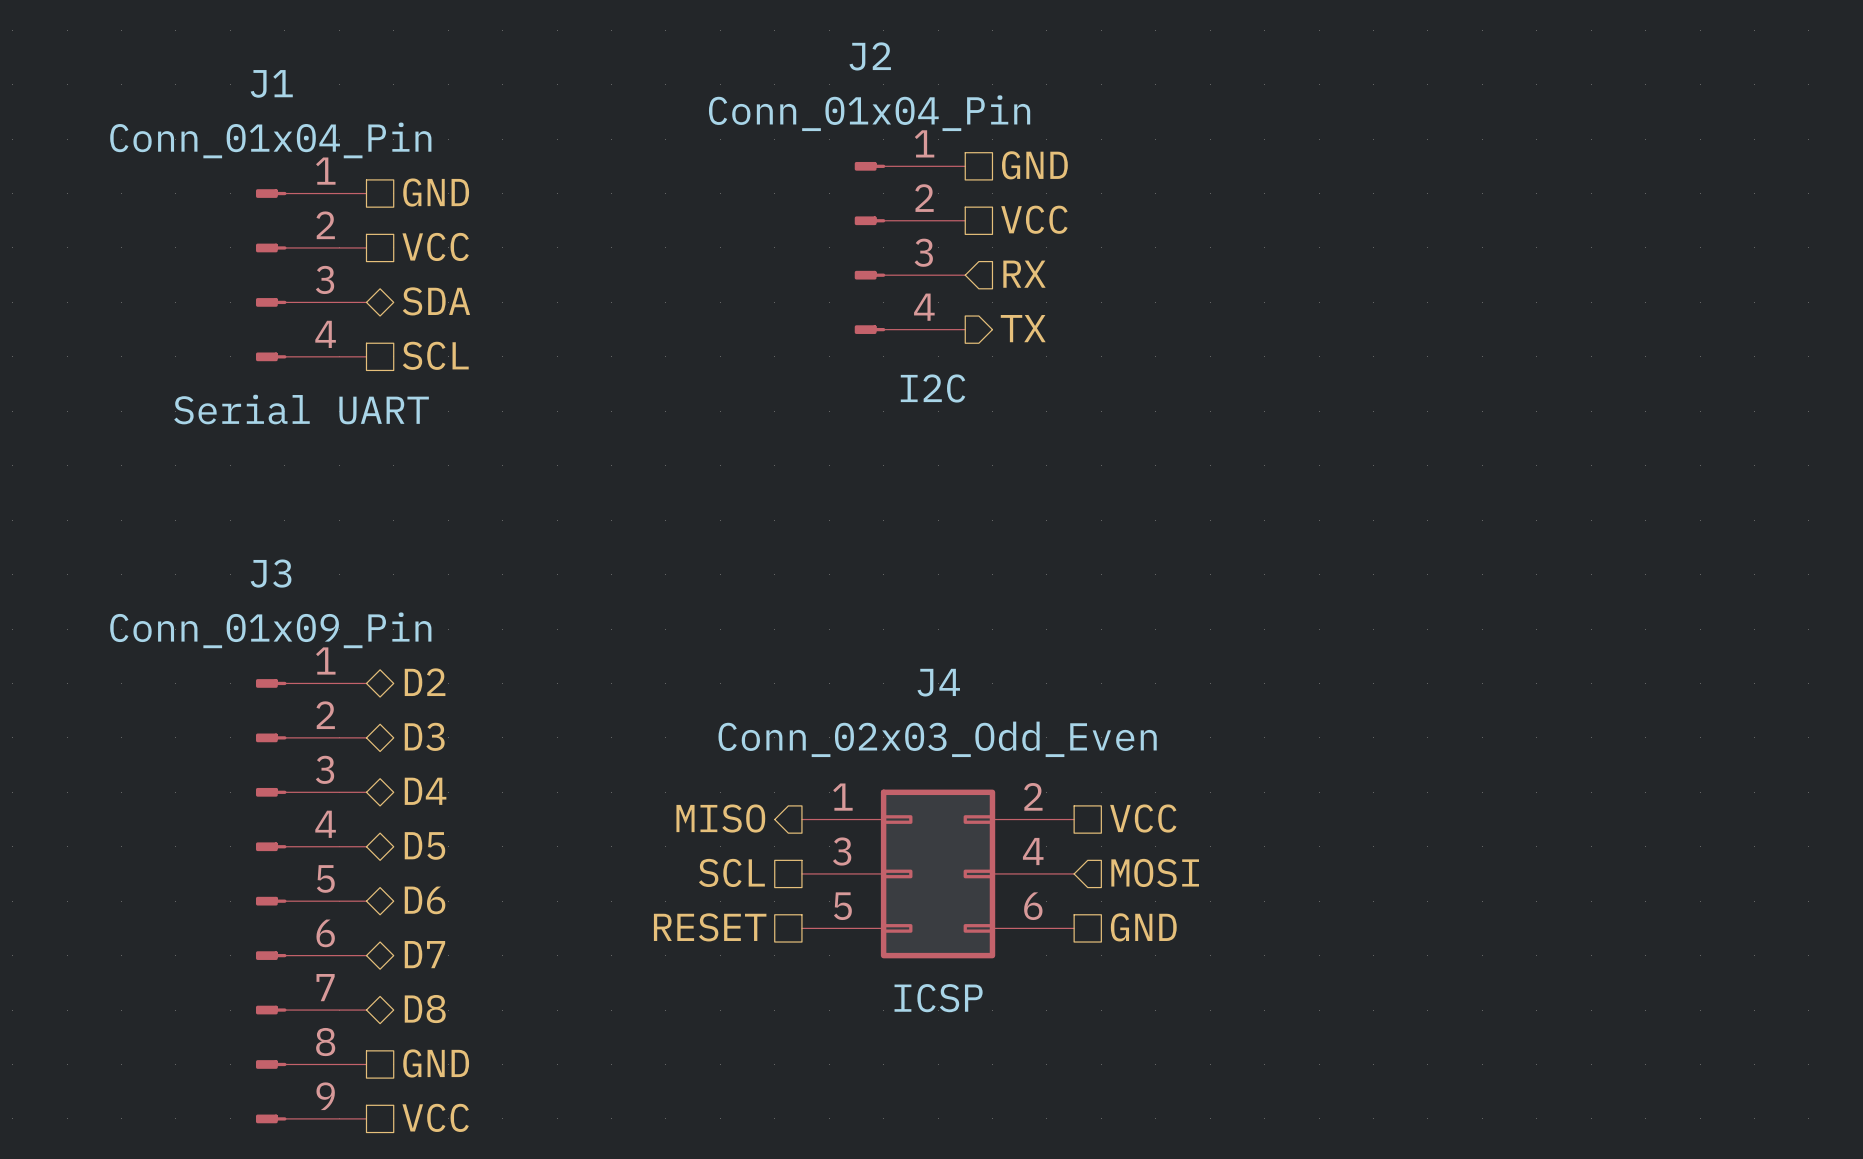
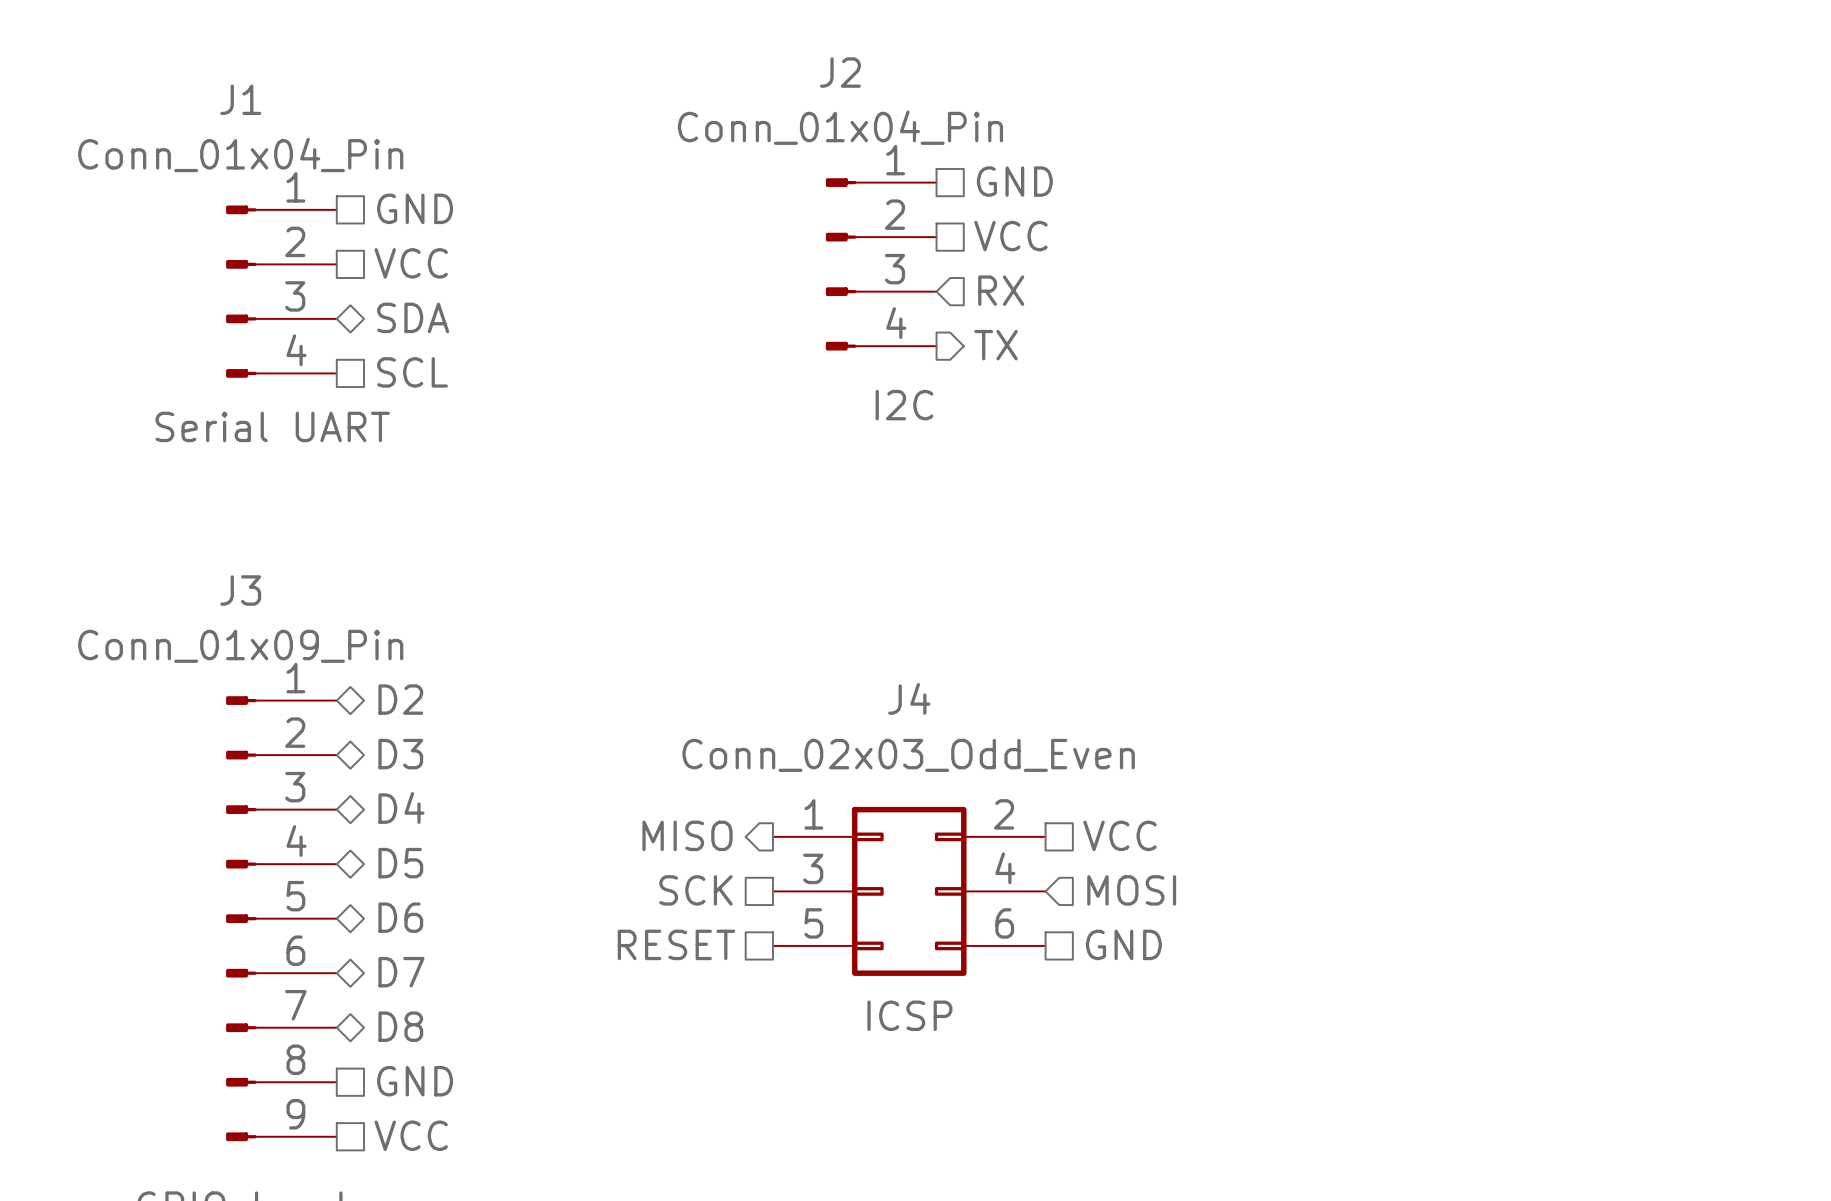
hierarchical label: SCL (731, 872) -> SCK (695, 890)

